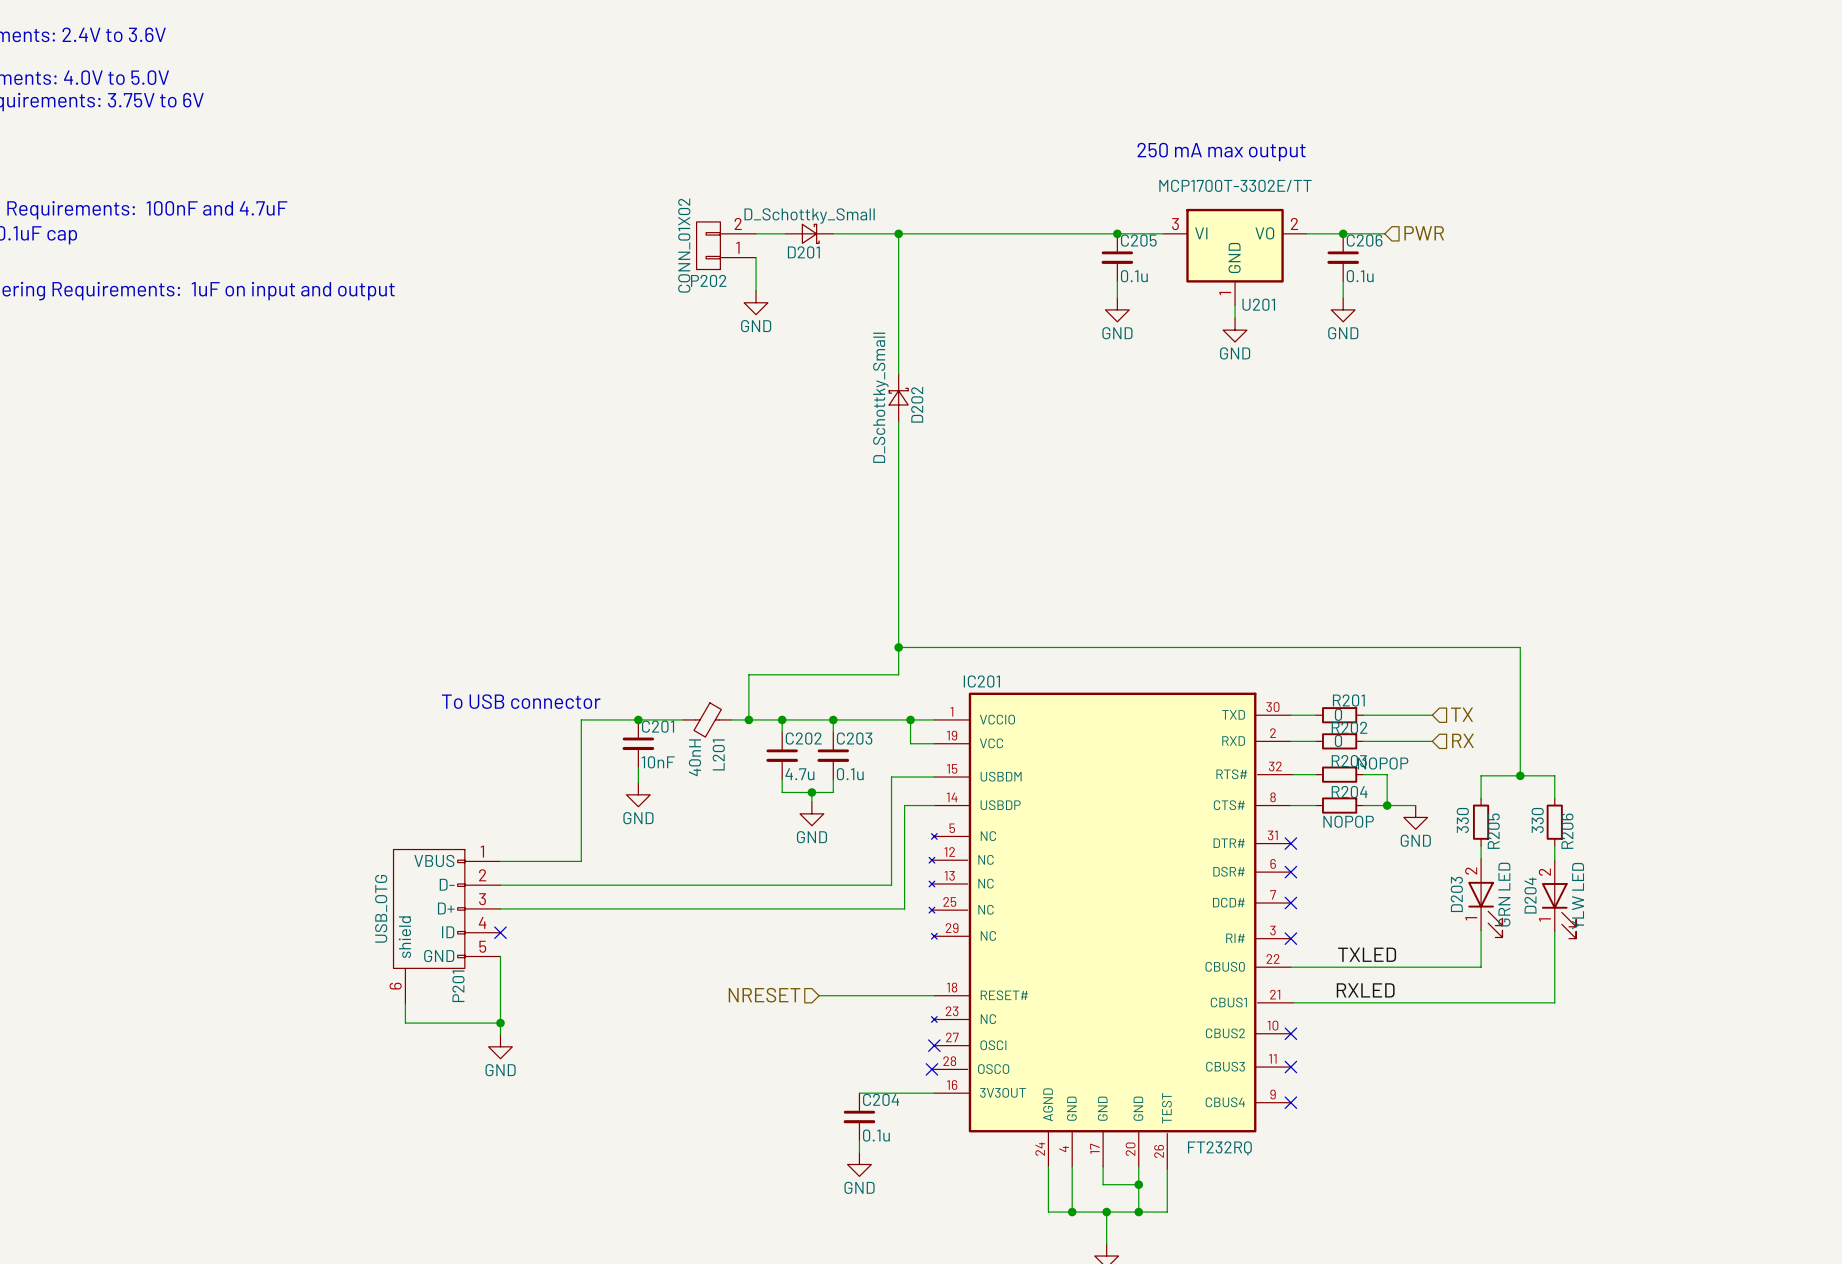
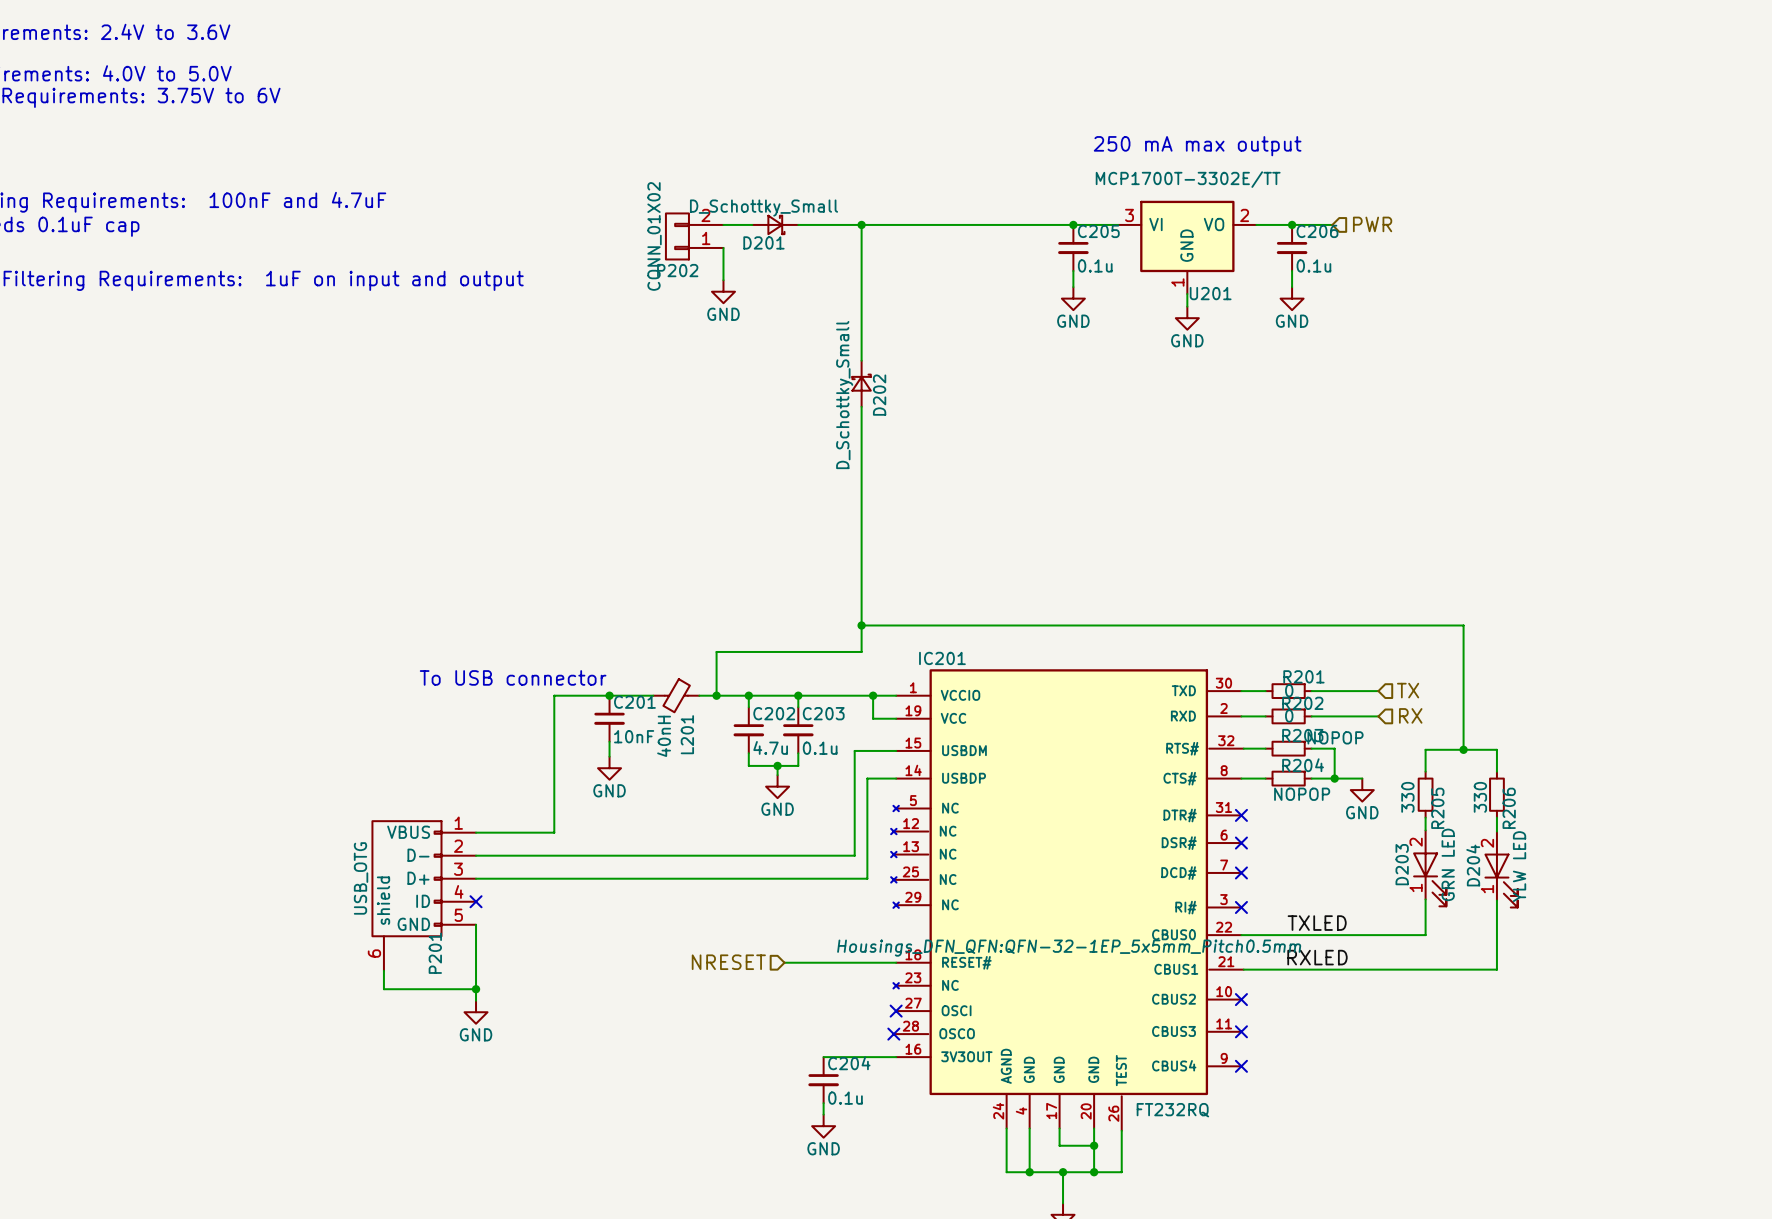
IC201 text: none -> Housings_DFN_QFN:QFN-32-1EP_5x5mm_Pitch0.5mm (1069, 948)

